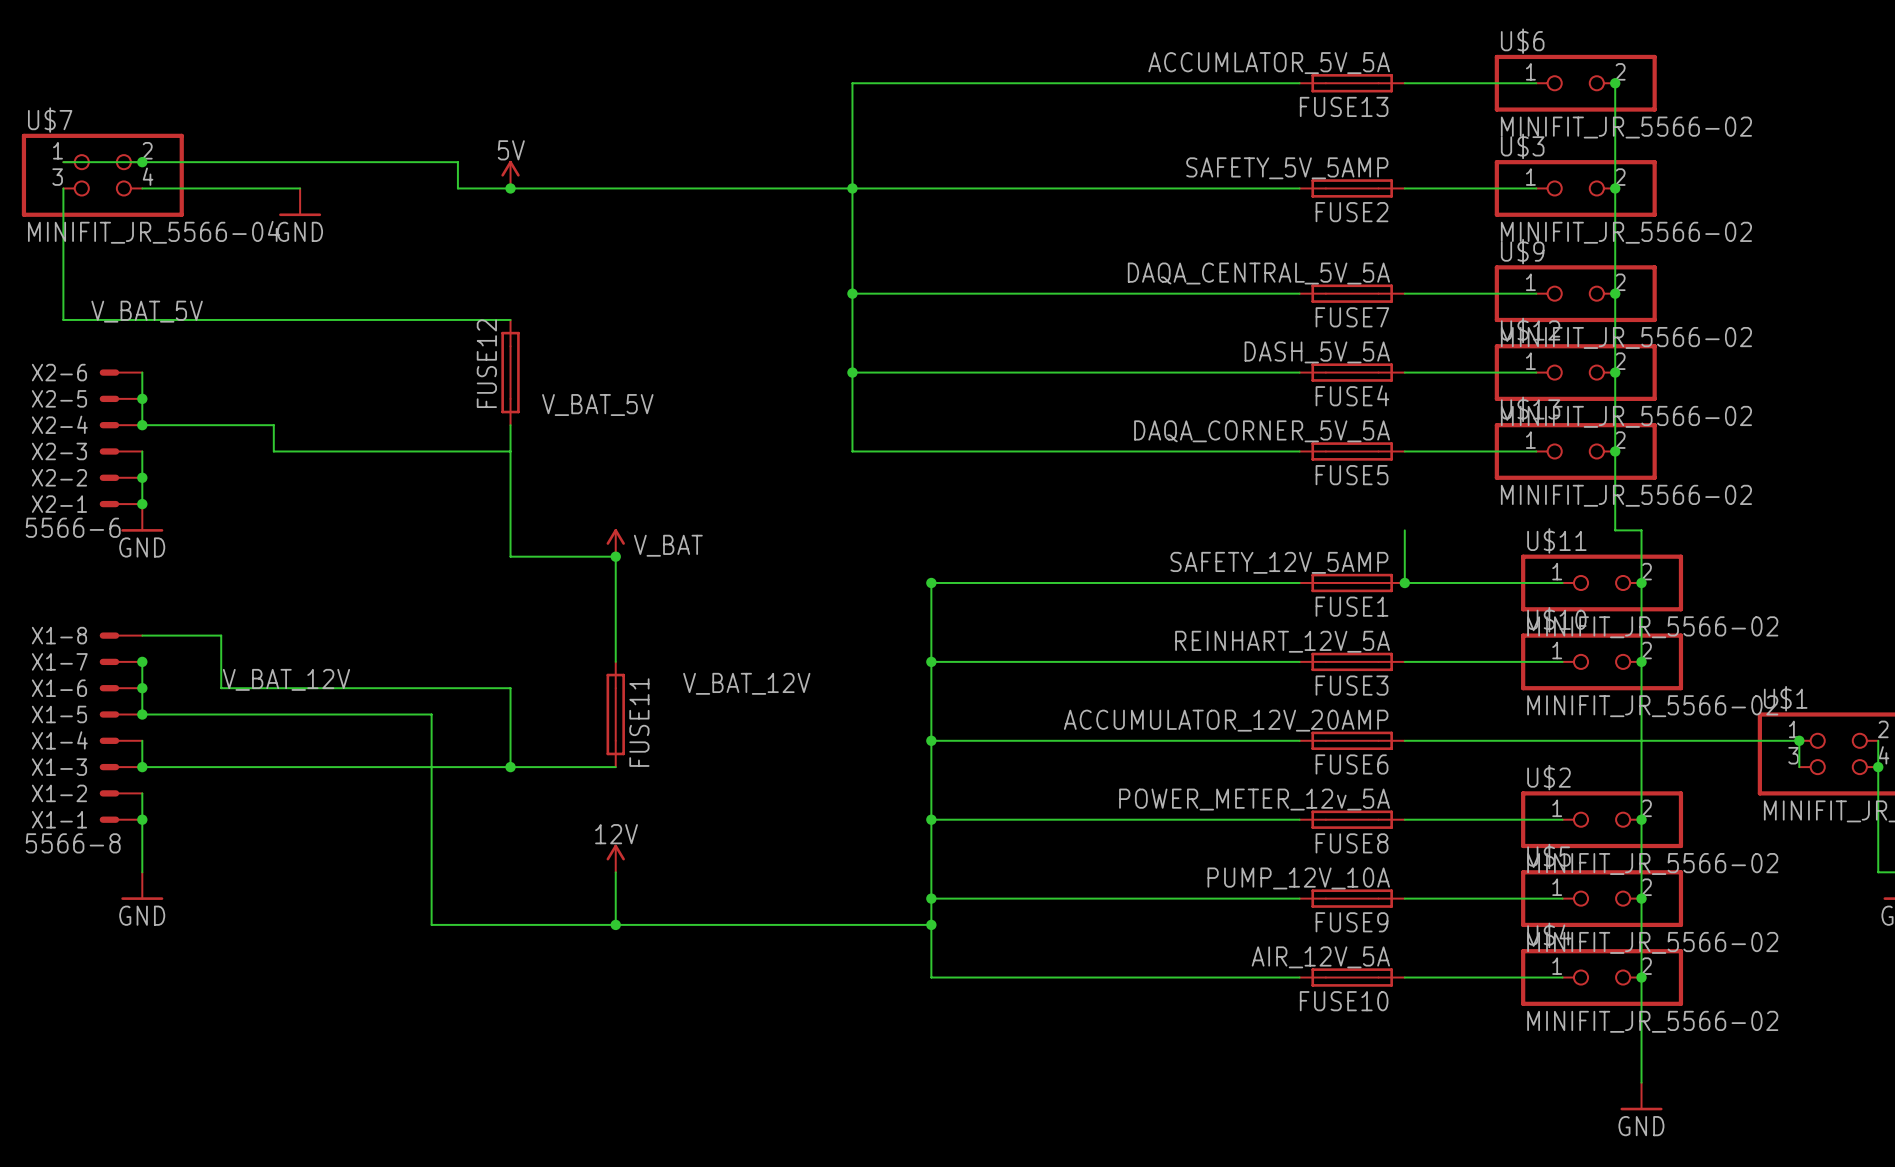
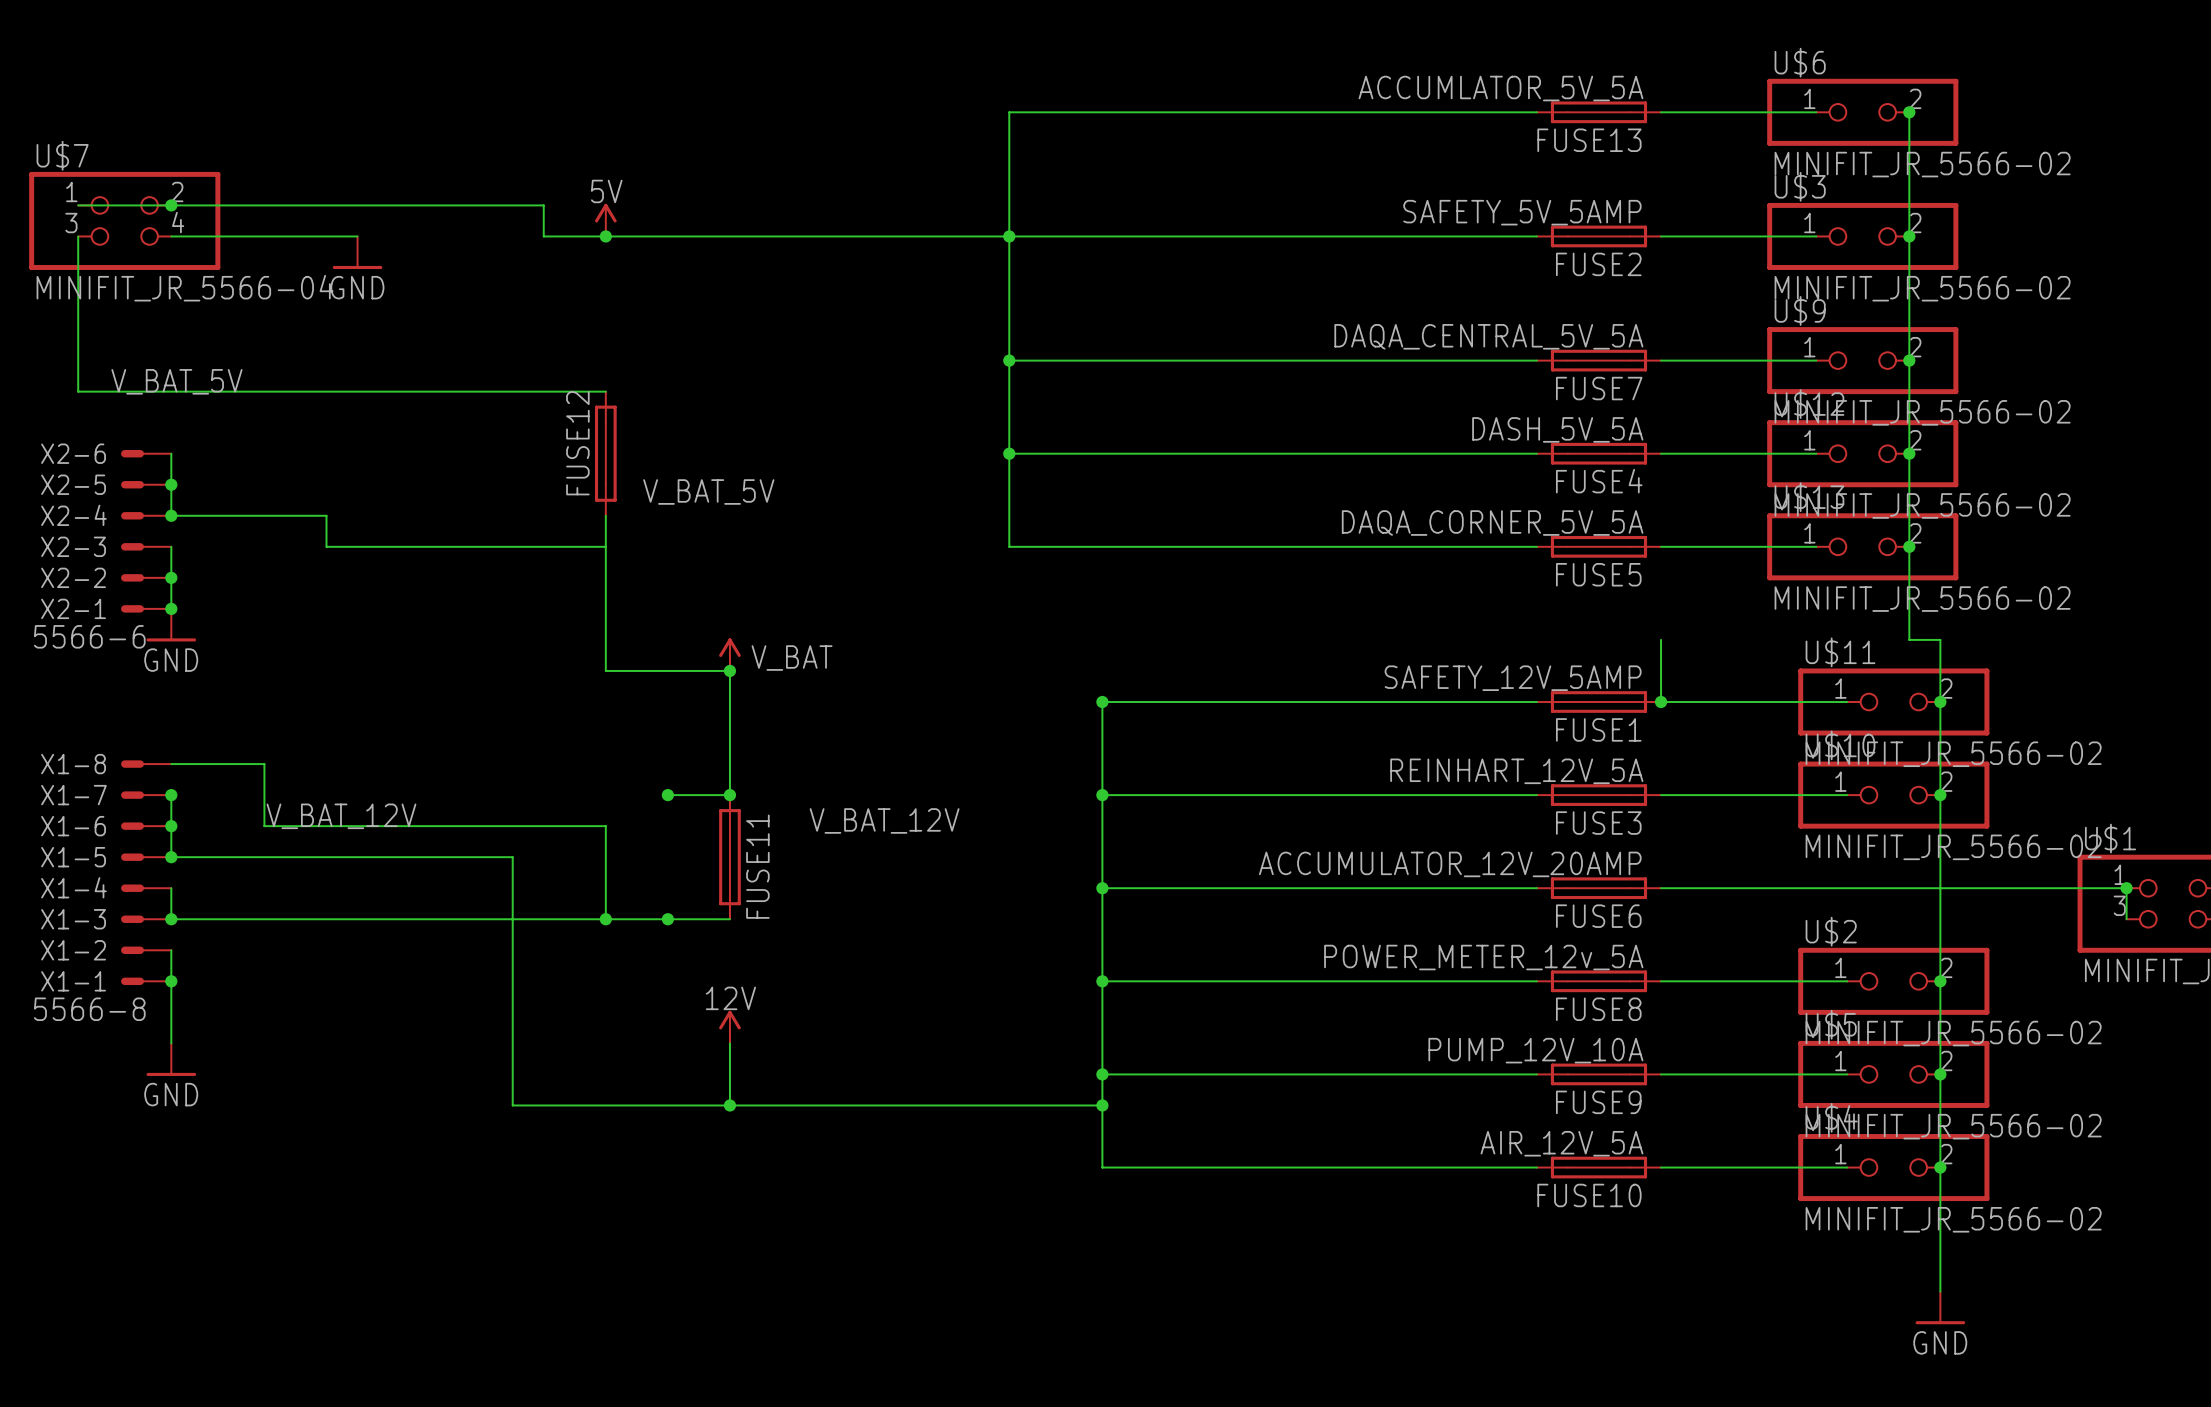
wire: none -> (667, 795) (729, 795)
junction: none -> (667, 795)
junction: none -> (729, 795)
junction: none -> (667, 919)

